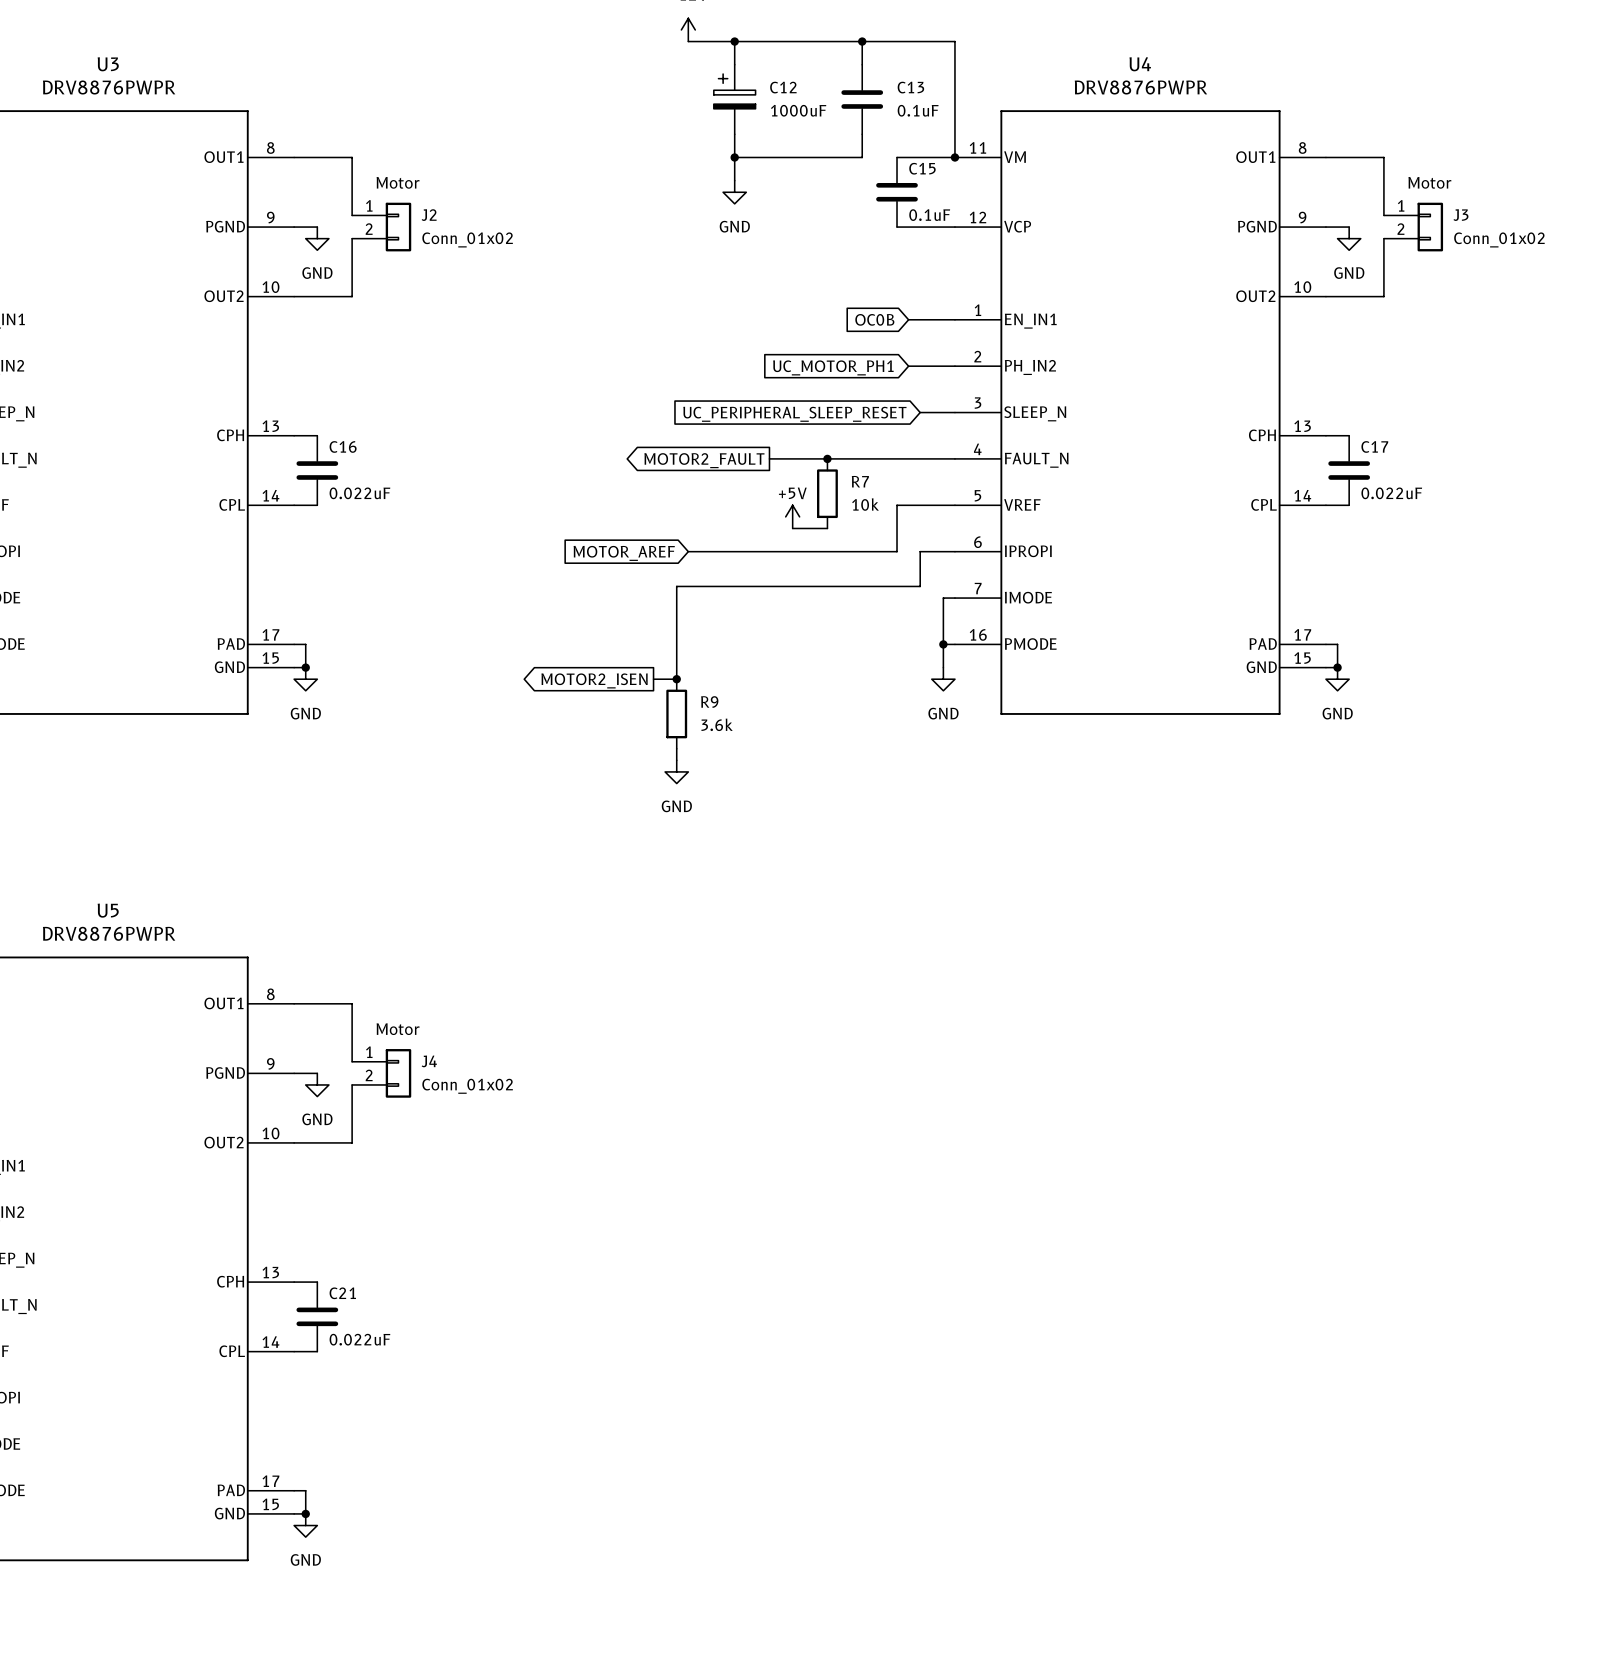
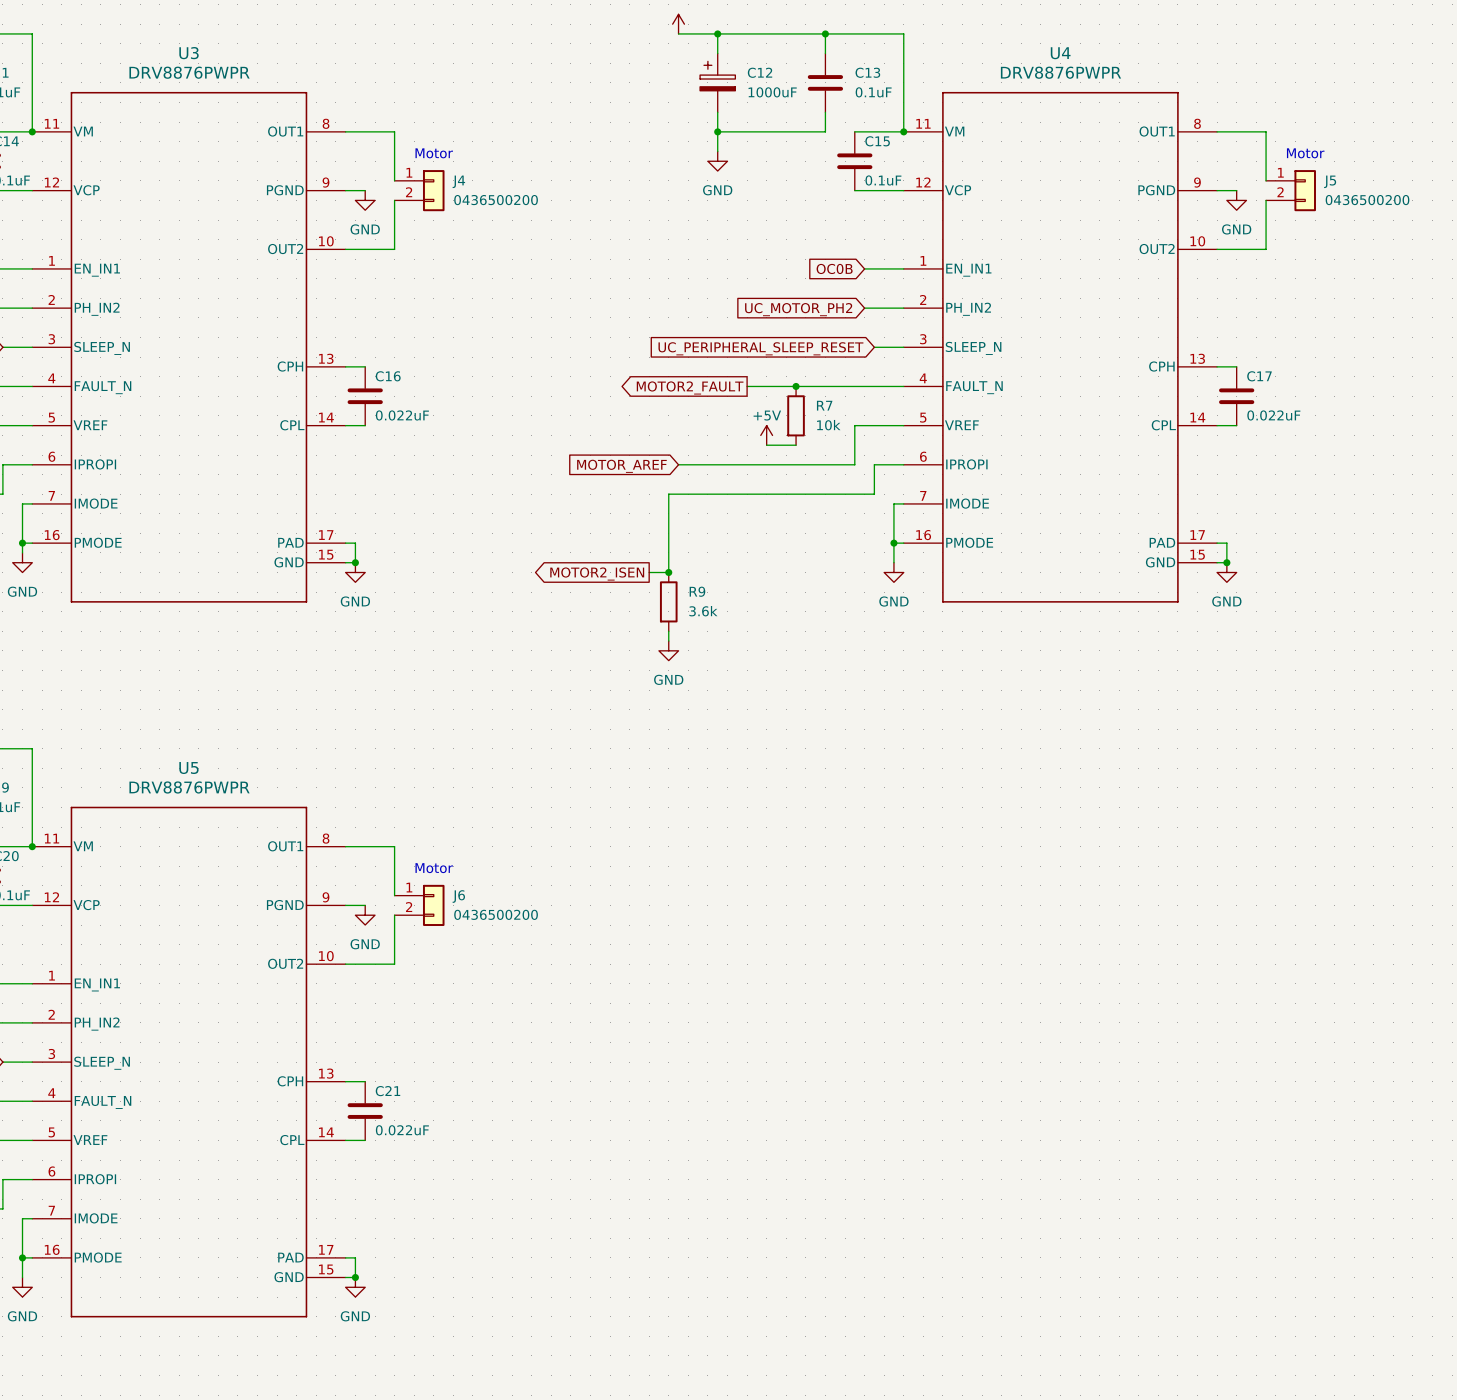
J2 name: J2 (429, 215) -> J4 (458, 181)
J3 name: J3 (1460, 215) -> J5 (1330, 181)
J2 value: Conn_01x02 (467, 239) -> 0436500200 (496, 200)
J3 value: Conn_01x02 (1499, 239) -> 0436500200 (1367, 200)
global label: UC_MOTOR_PH1 (833, 367) -> UC_MOTOR_PH2 (798, 309)
J4 name: J4 (429, 1061) -> J6 (458, 896)
J4 value: Conn_01x02 (467, 1086) -> 0436500200 (496, 914)

